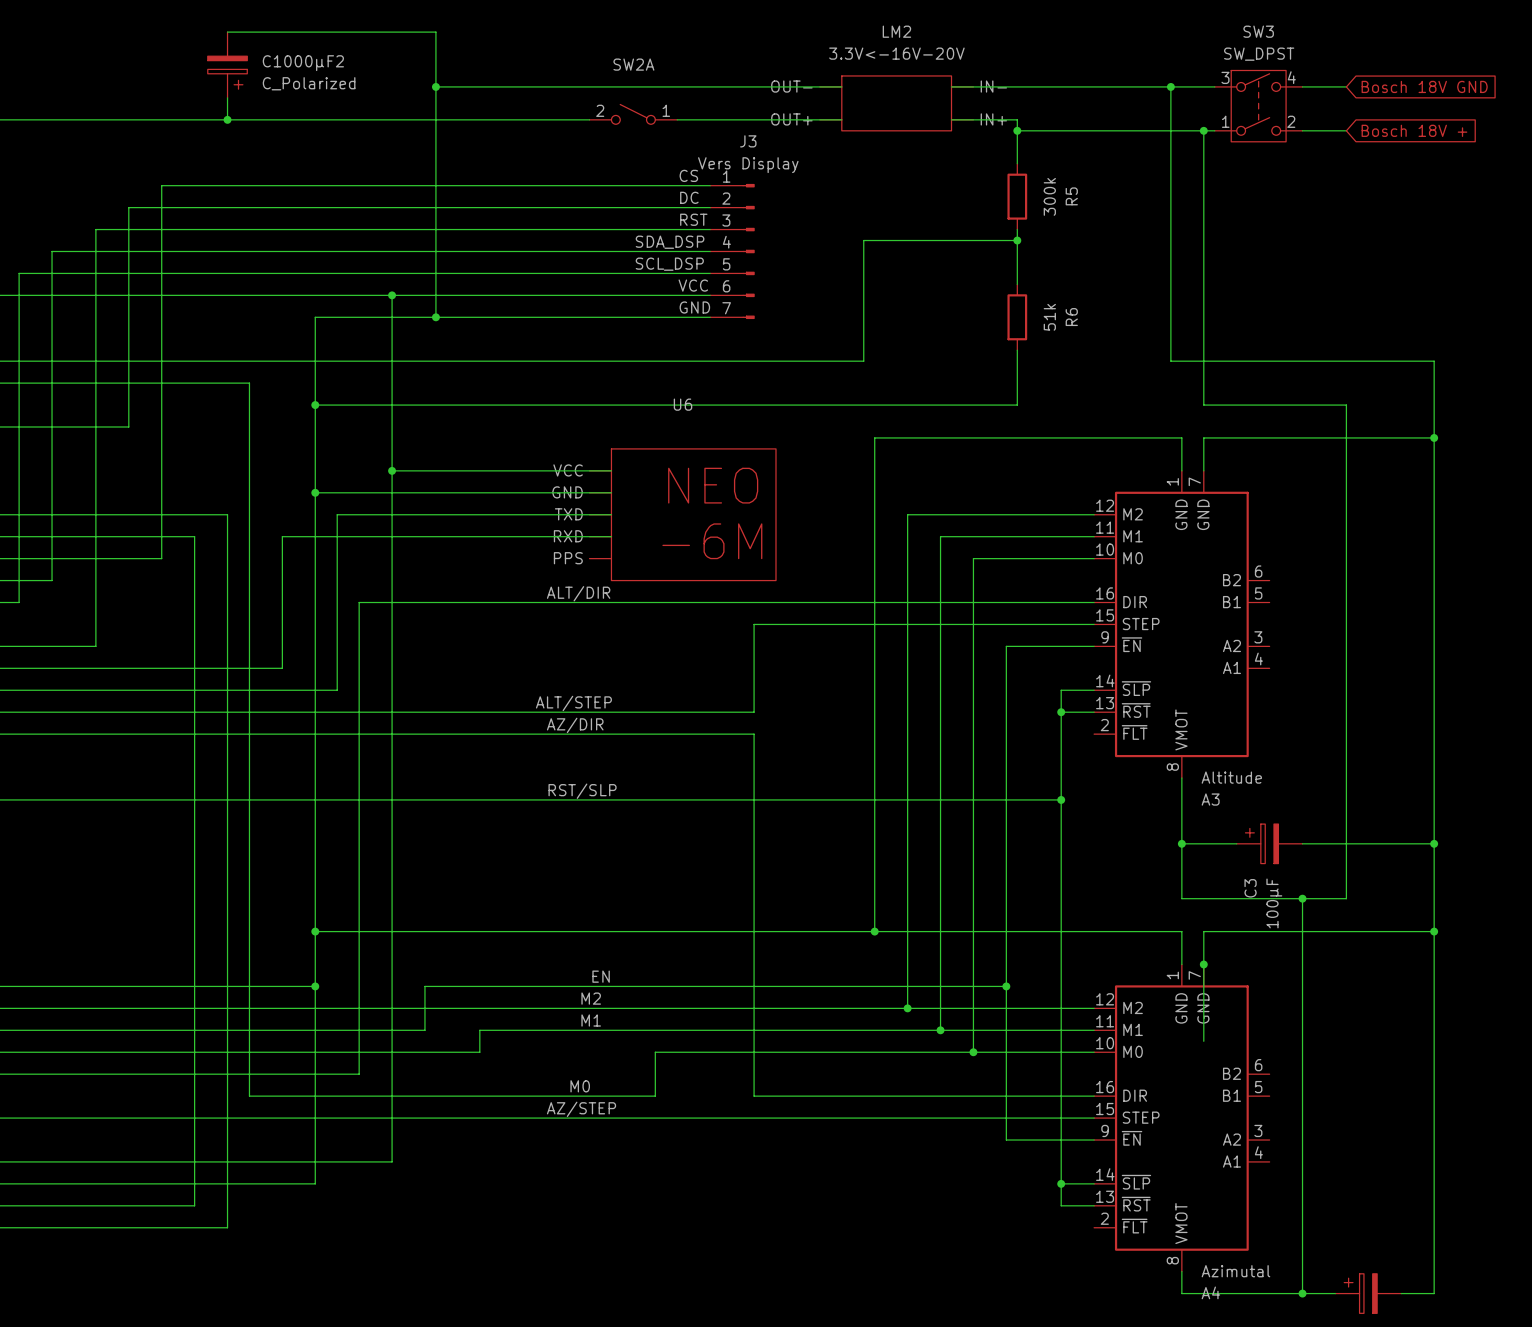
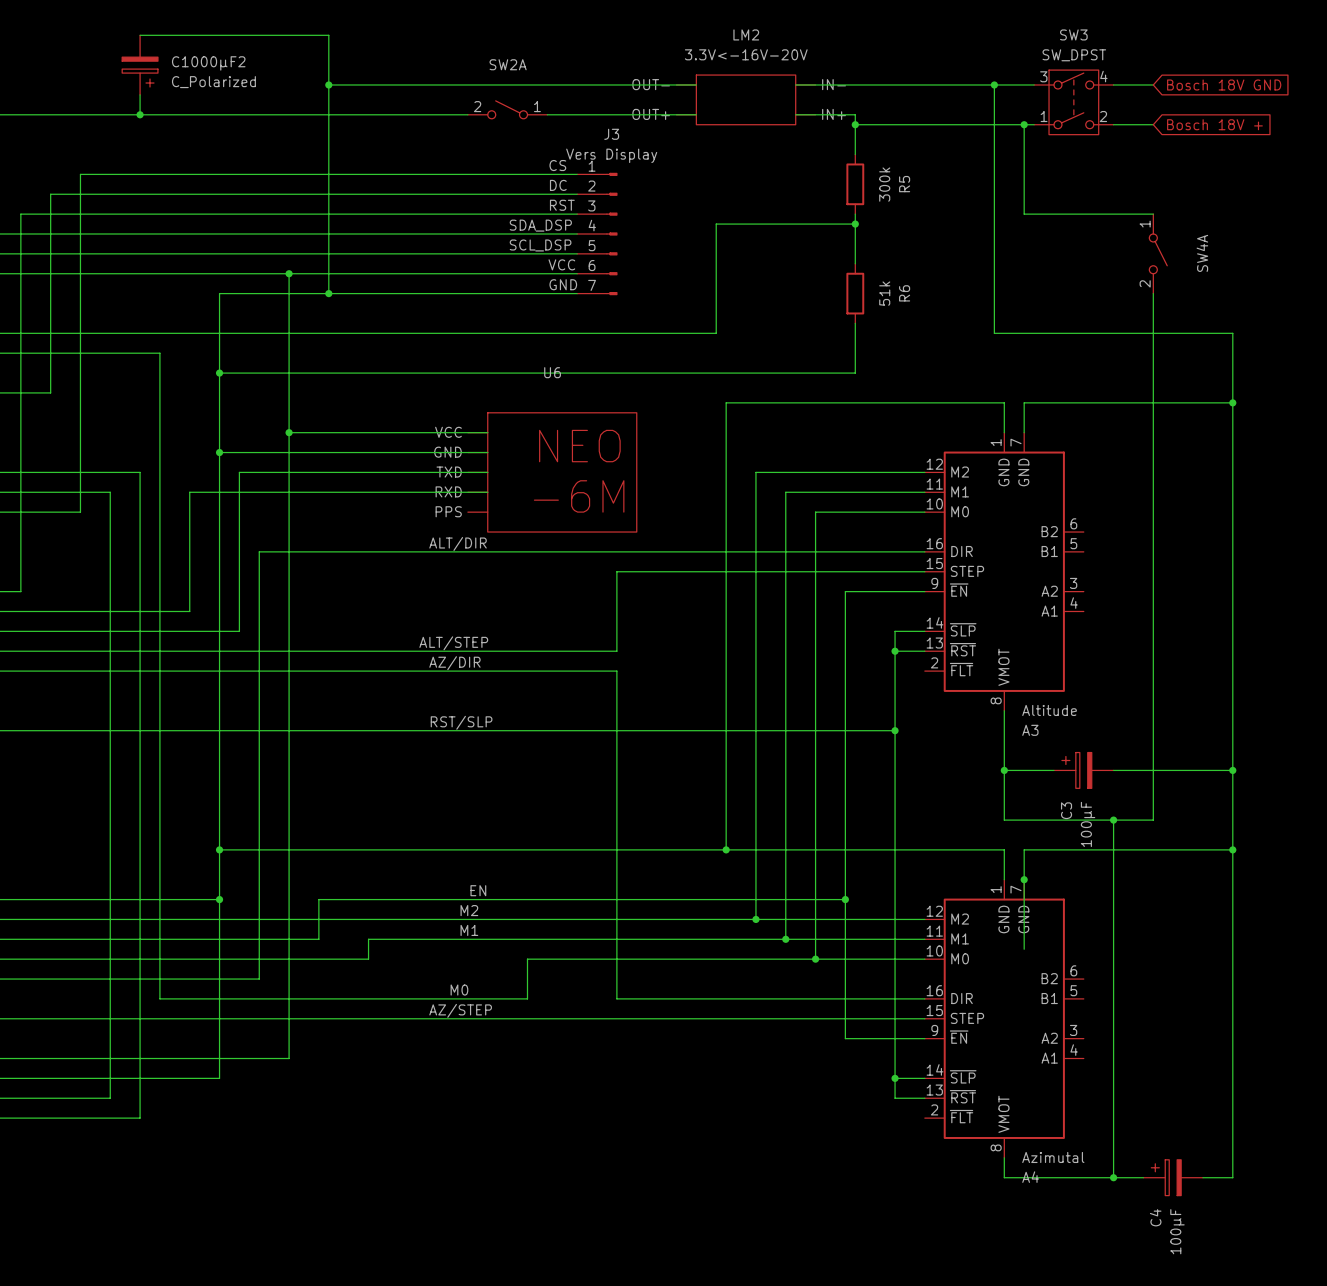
wire: (1203, 229) (1203, 405) (1346, 405) -> (1153, 293) (1153, 373)
wire: none -> (1024, 214) (1153, 214)
SW4A: none -> (1158, 253)

